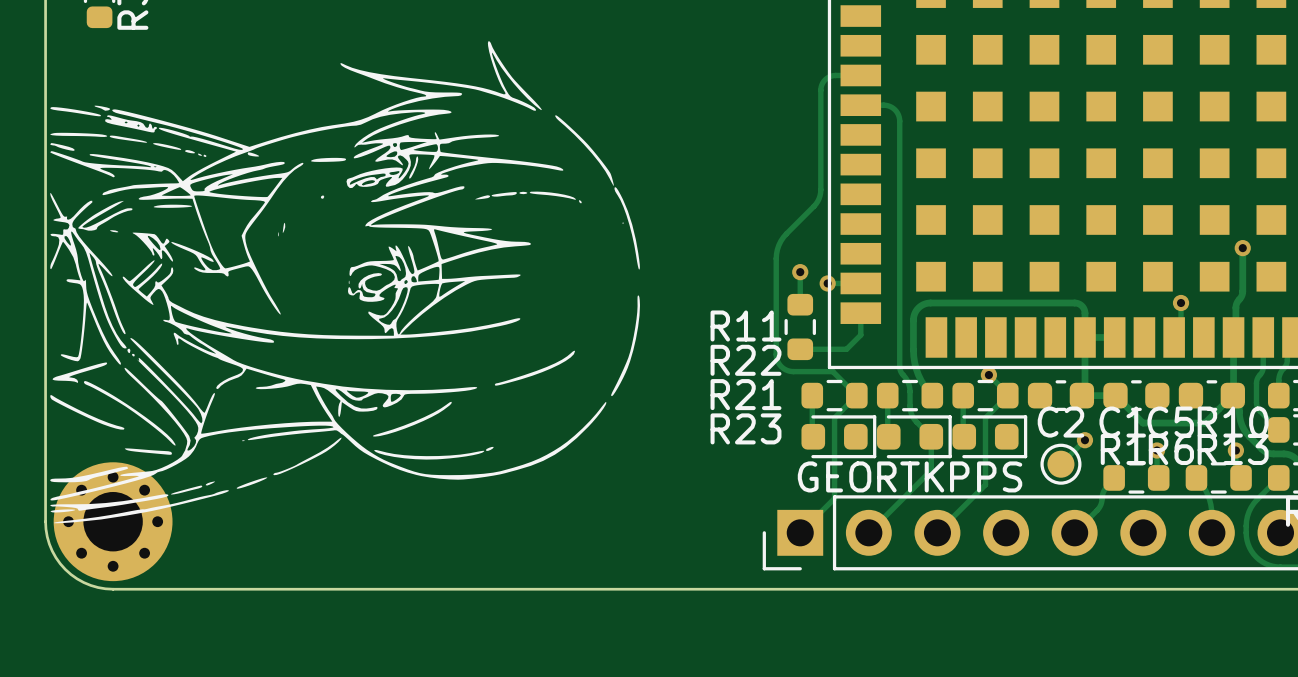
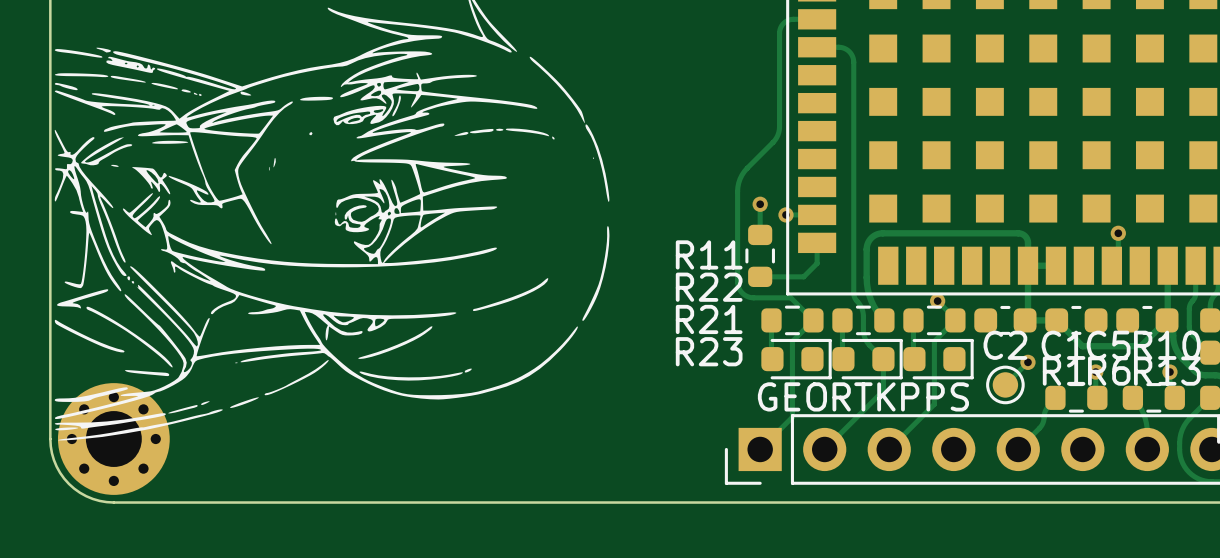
track: (1242, 248) (1242, 292) (1236, 305) (1235, 332) (1233, 337) -> none
via: (1242, 248) -> none

